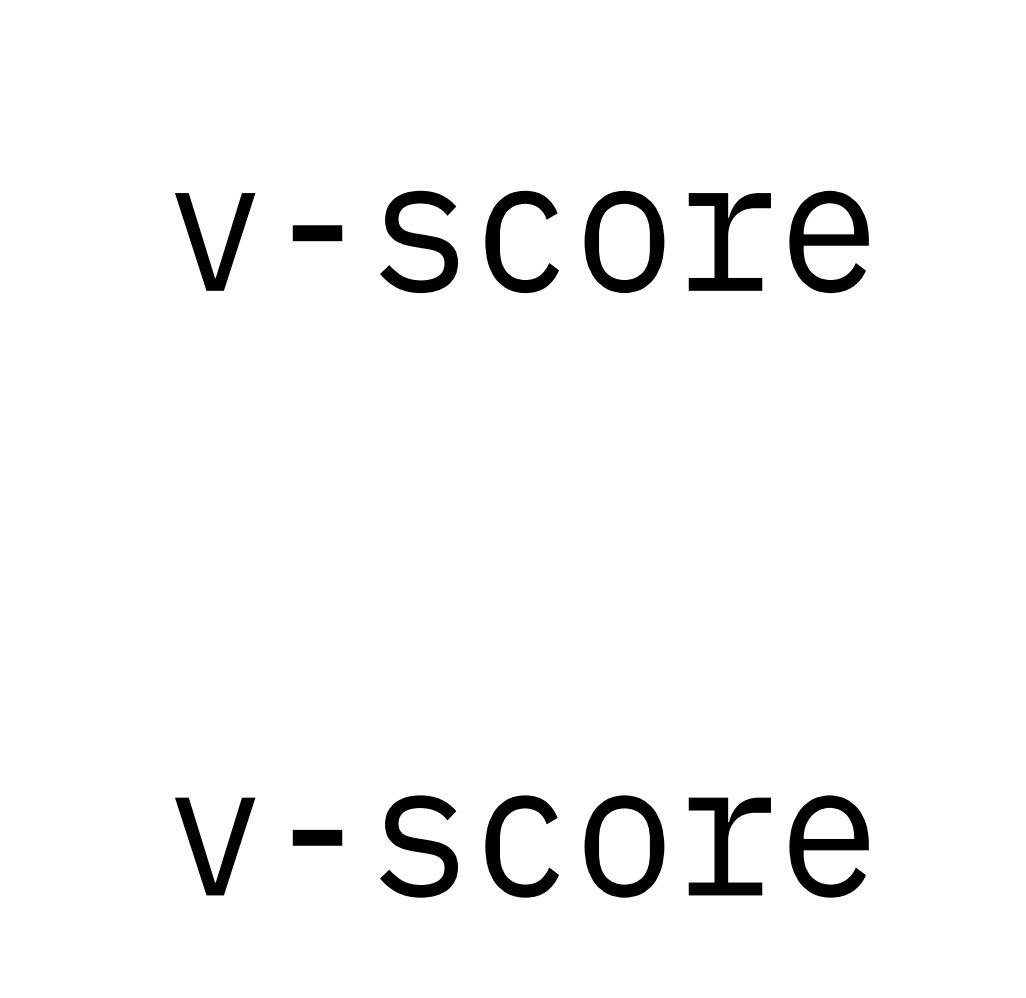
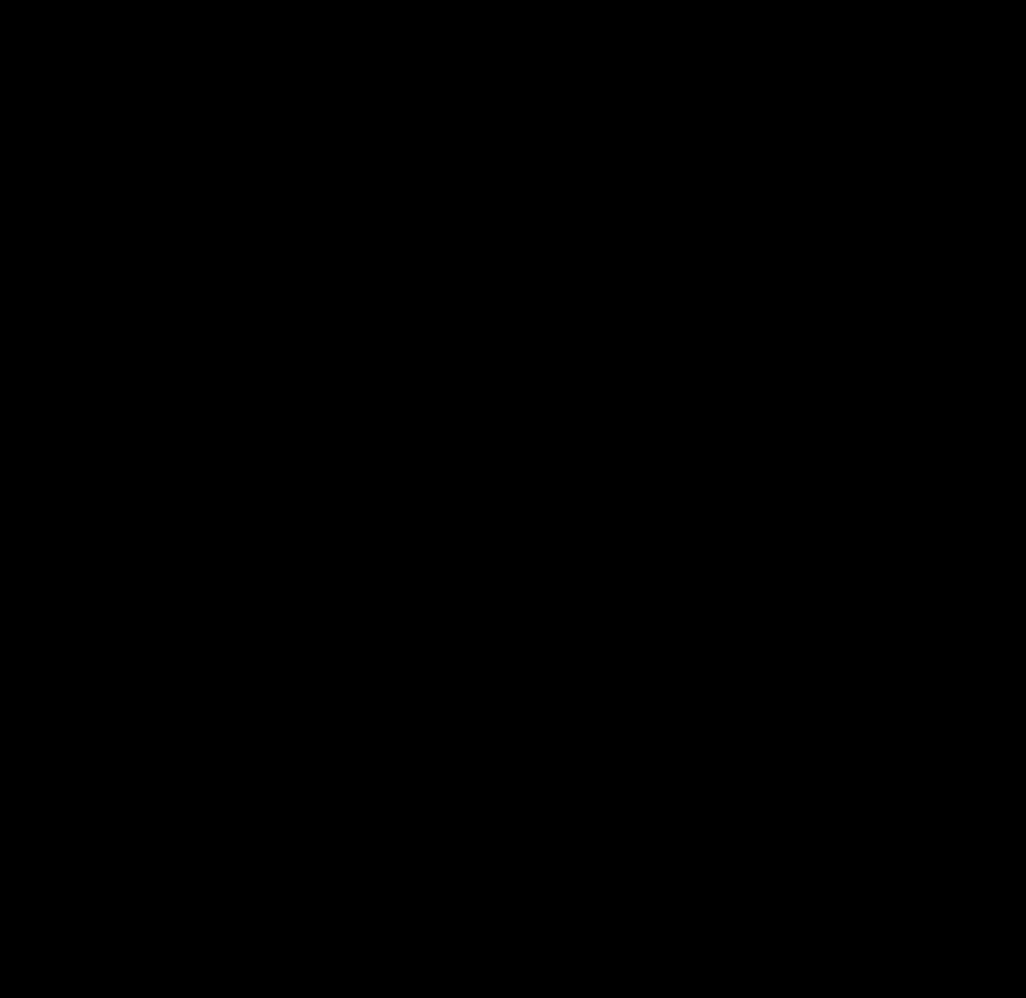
text: v-score (521, 241) -> none
text: v-score (521, 846) -> none

